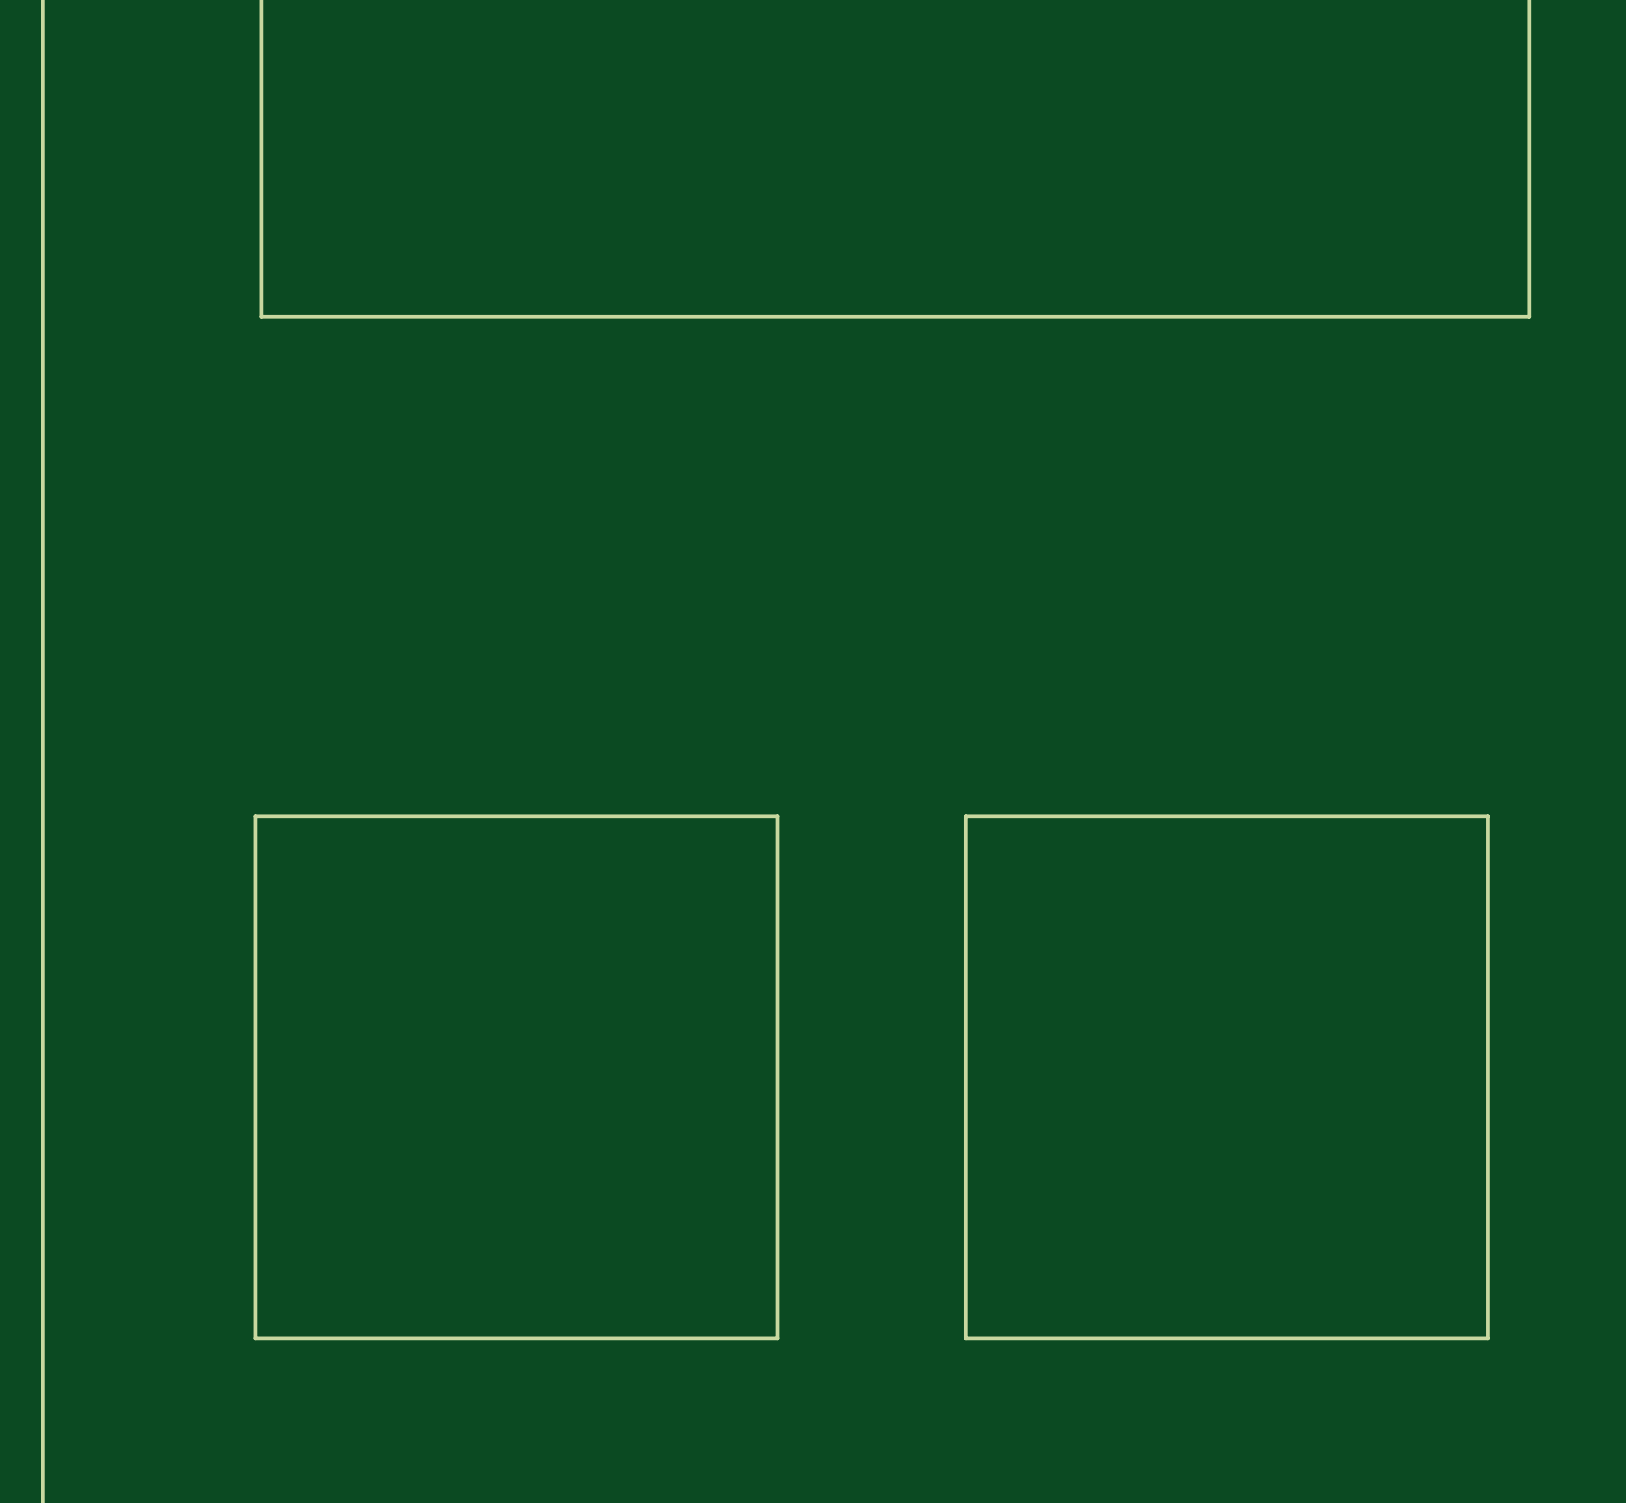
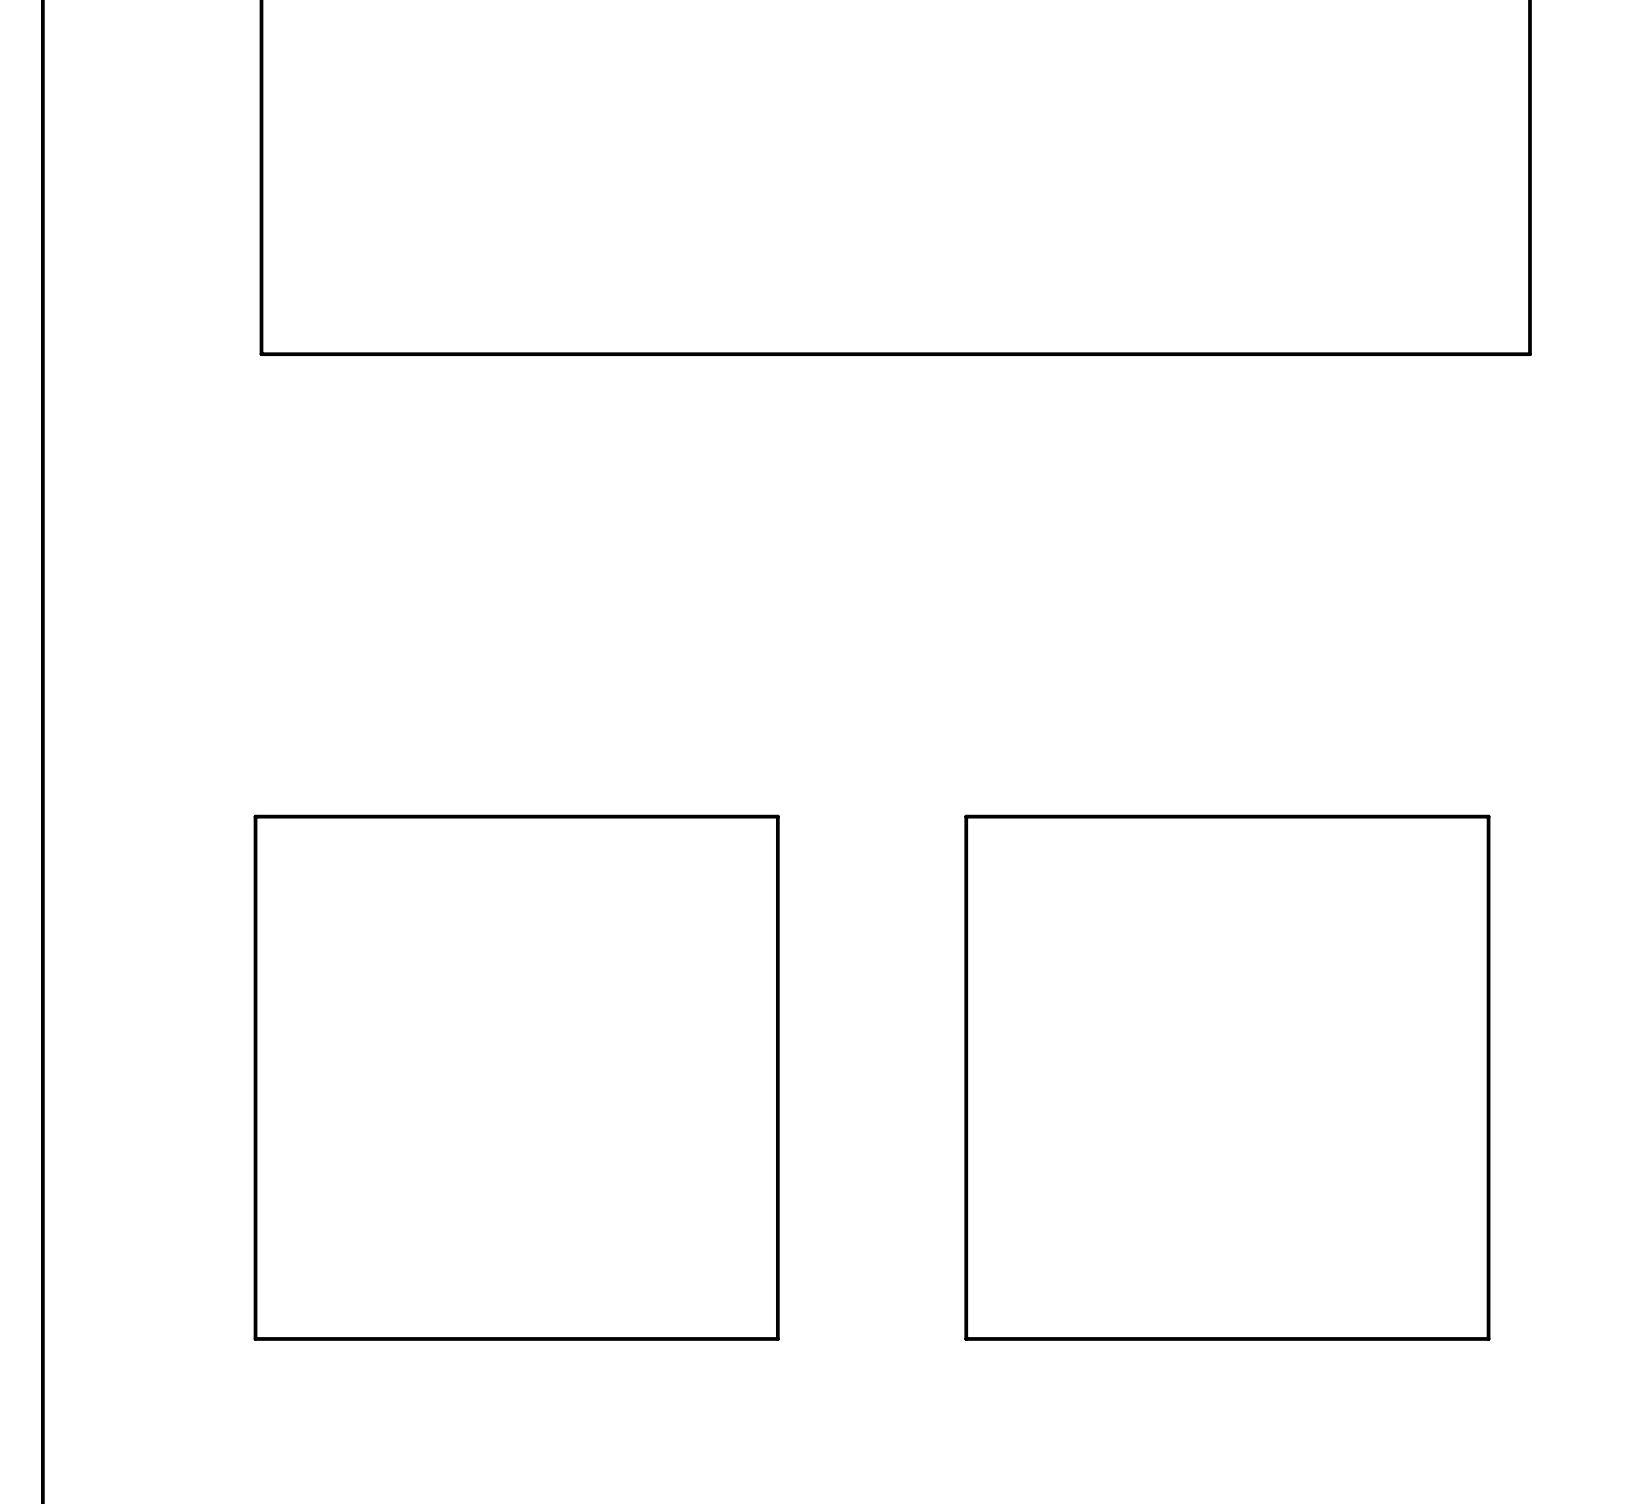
board edge: (261, 316) (1529, 316) -> (261, 316) (261, 354) (1529, 354) (1529, 316)

